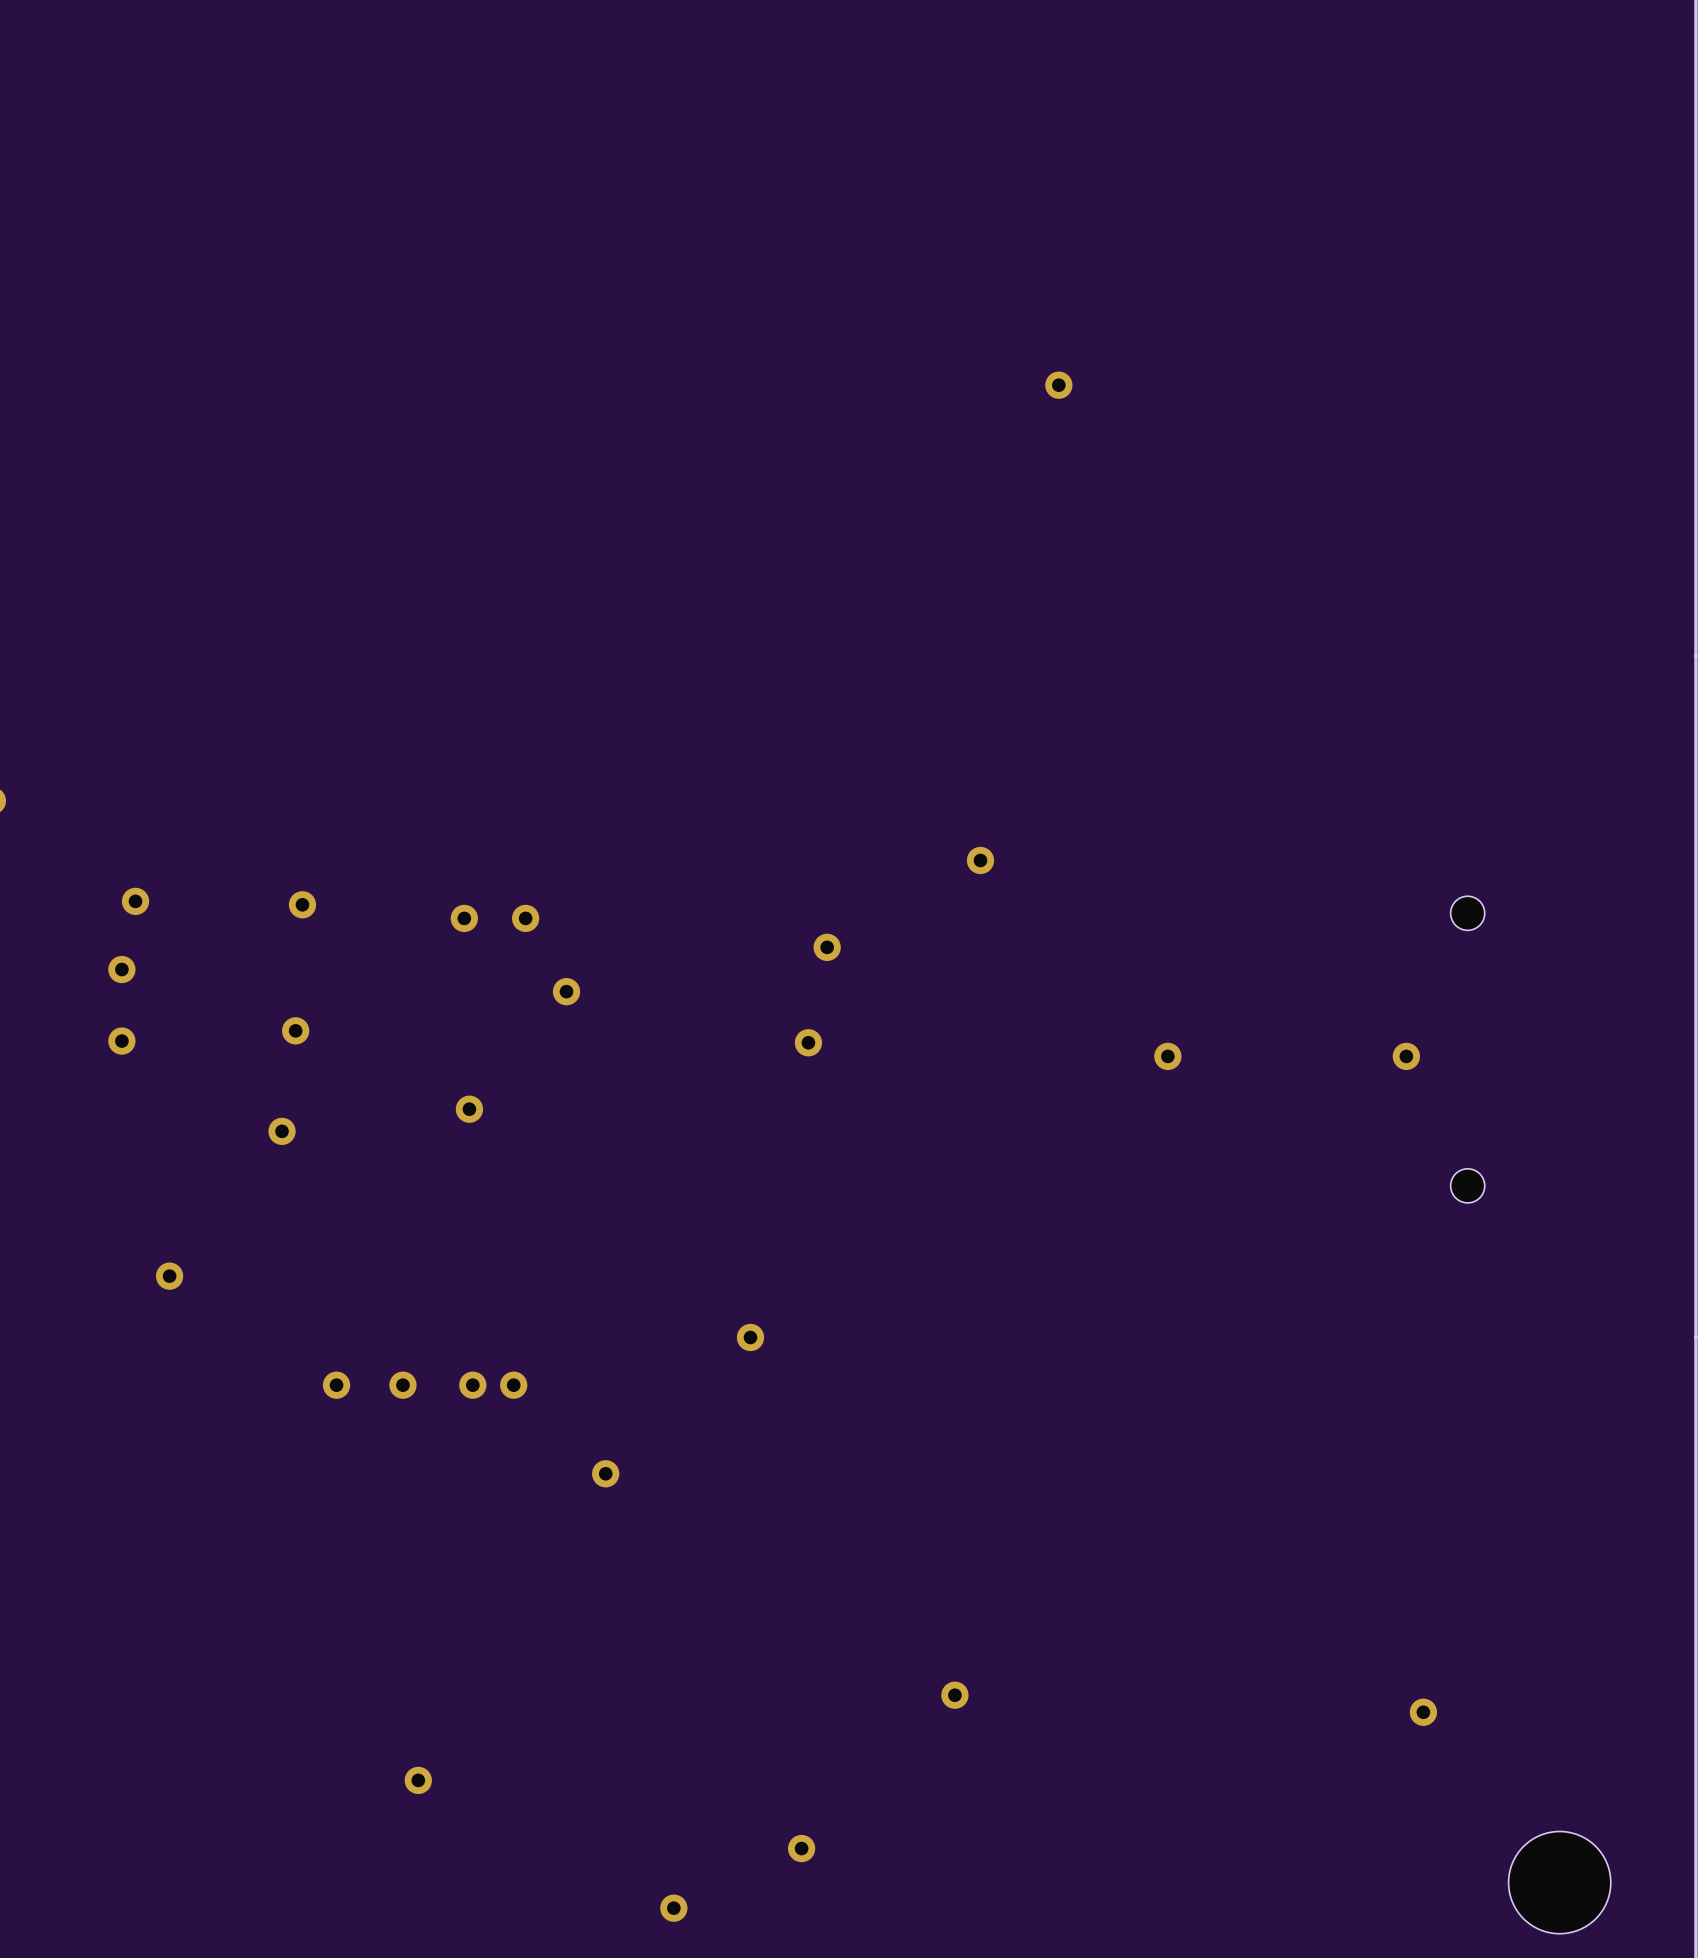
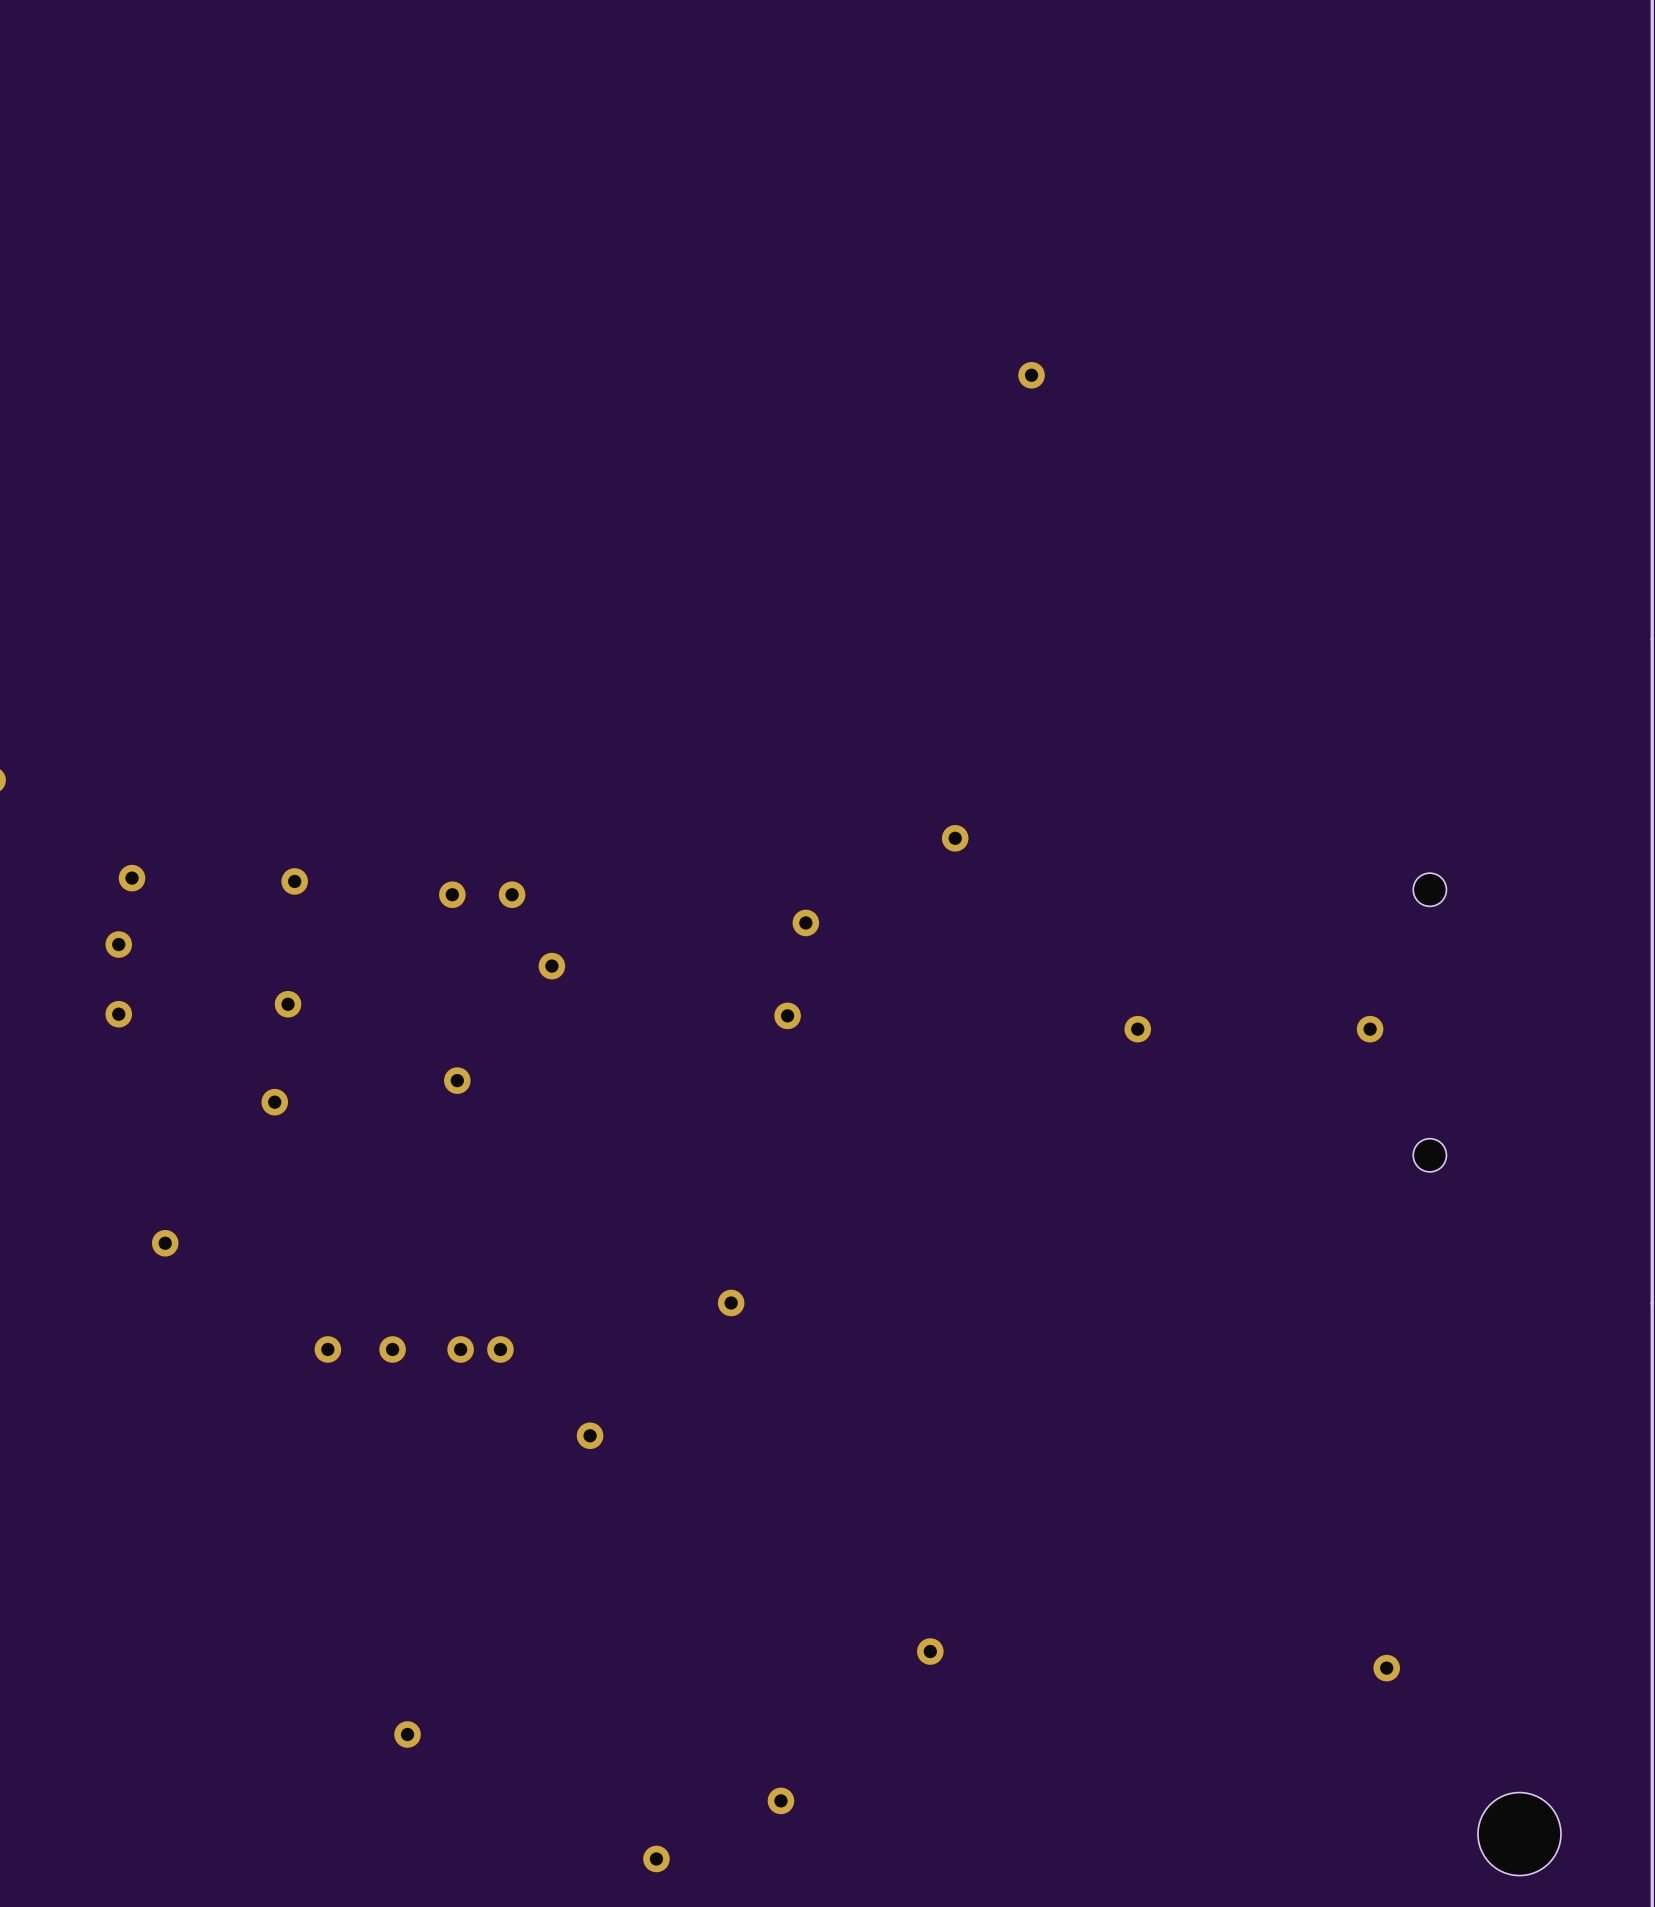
part footprint: [1508, 1831, 1611, 1934] -> [1477, 1792, 1561, 1876]

